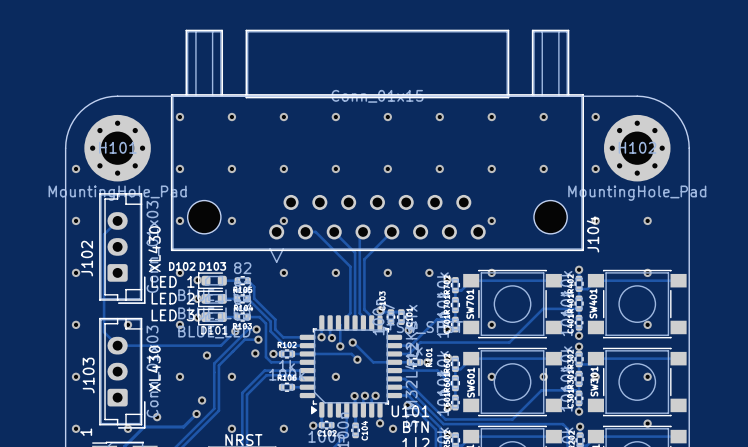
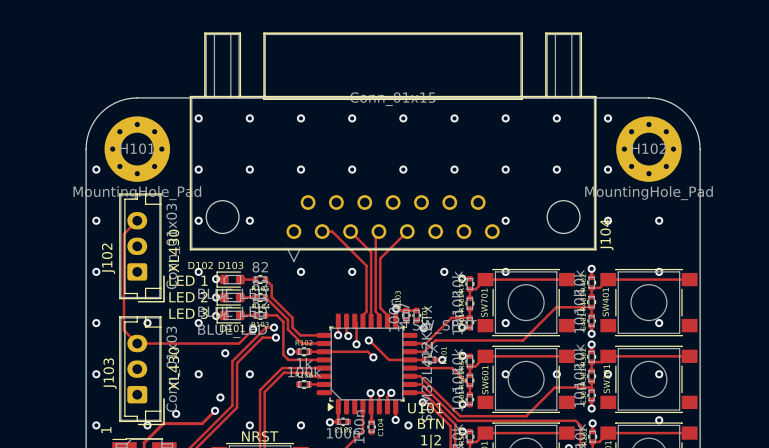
via: (283, 220) -> none
via: (387, 272) -> none
via: (255, 353) -> none
via: (335, 376) -> none

